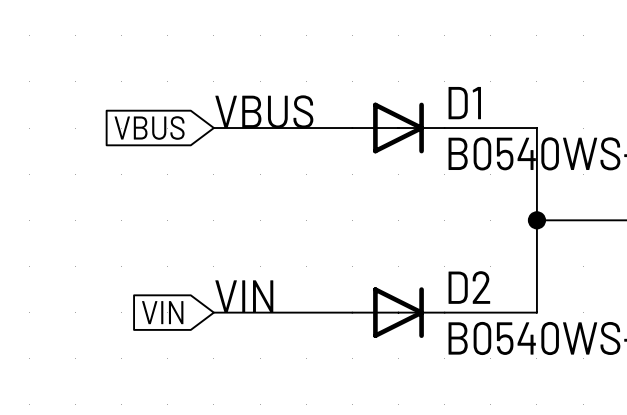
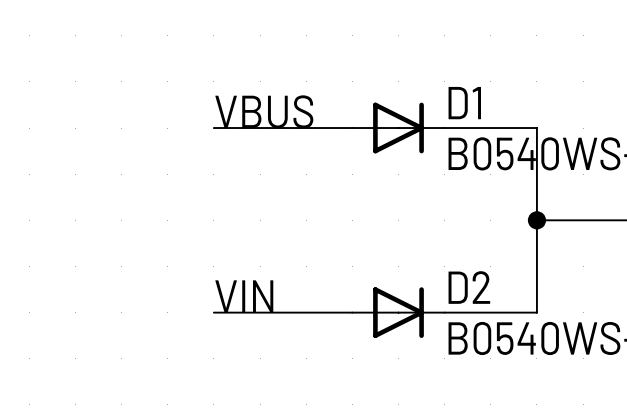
global label: VBUS (149, 128) -> none
global label: VIN (162, 312) -> none

